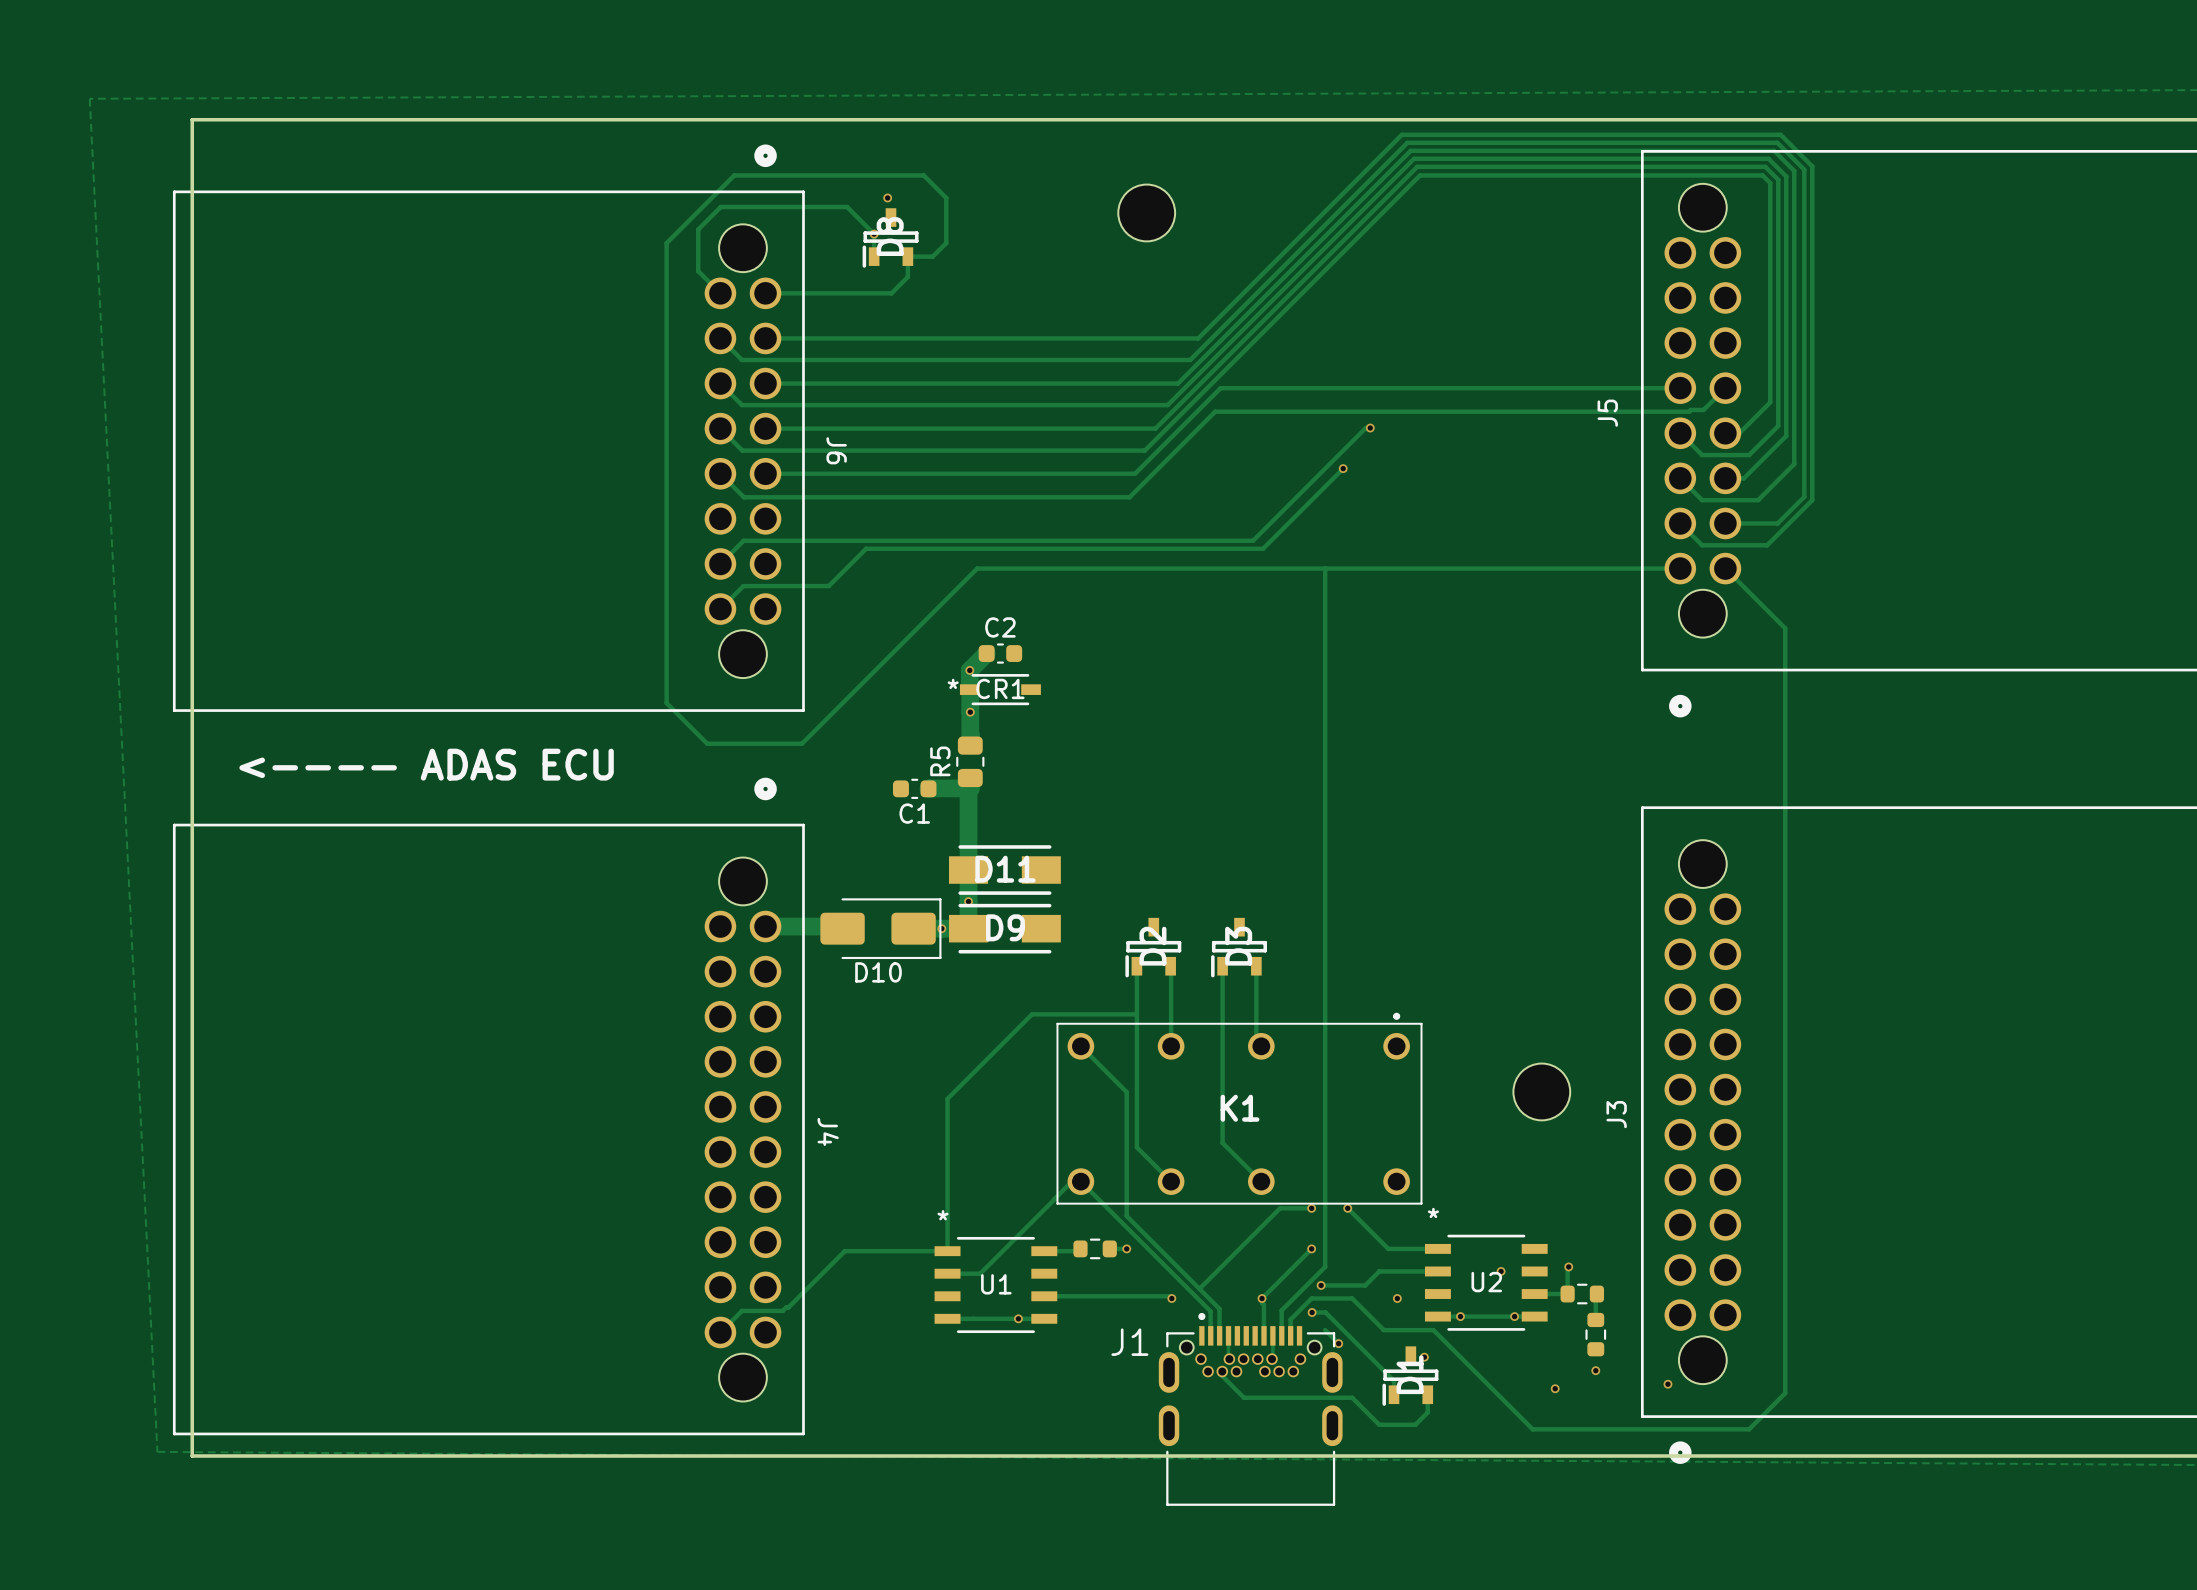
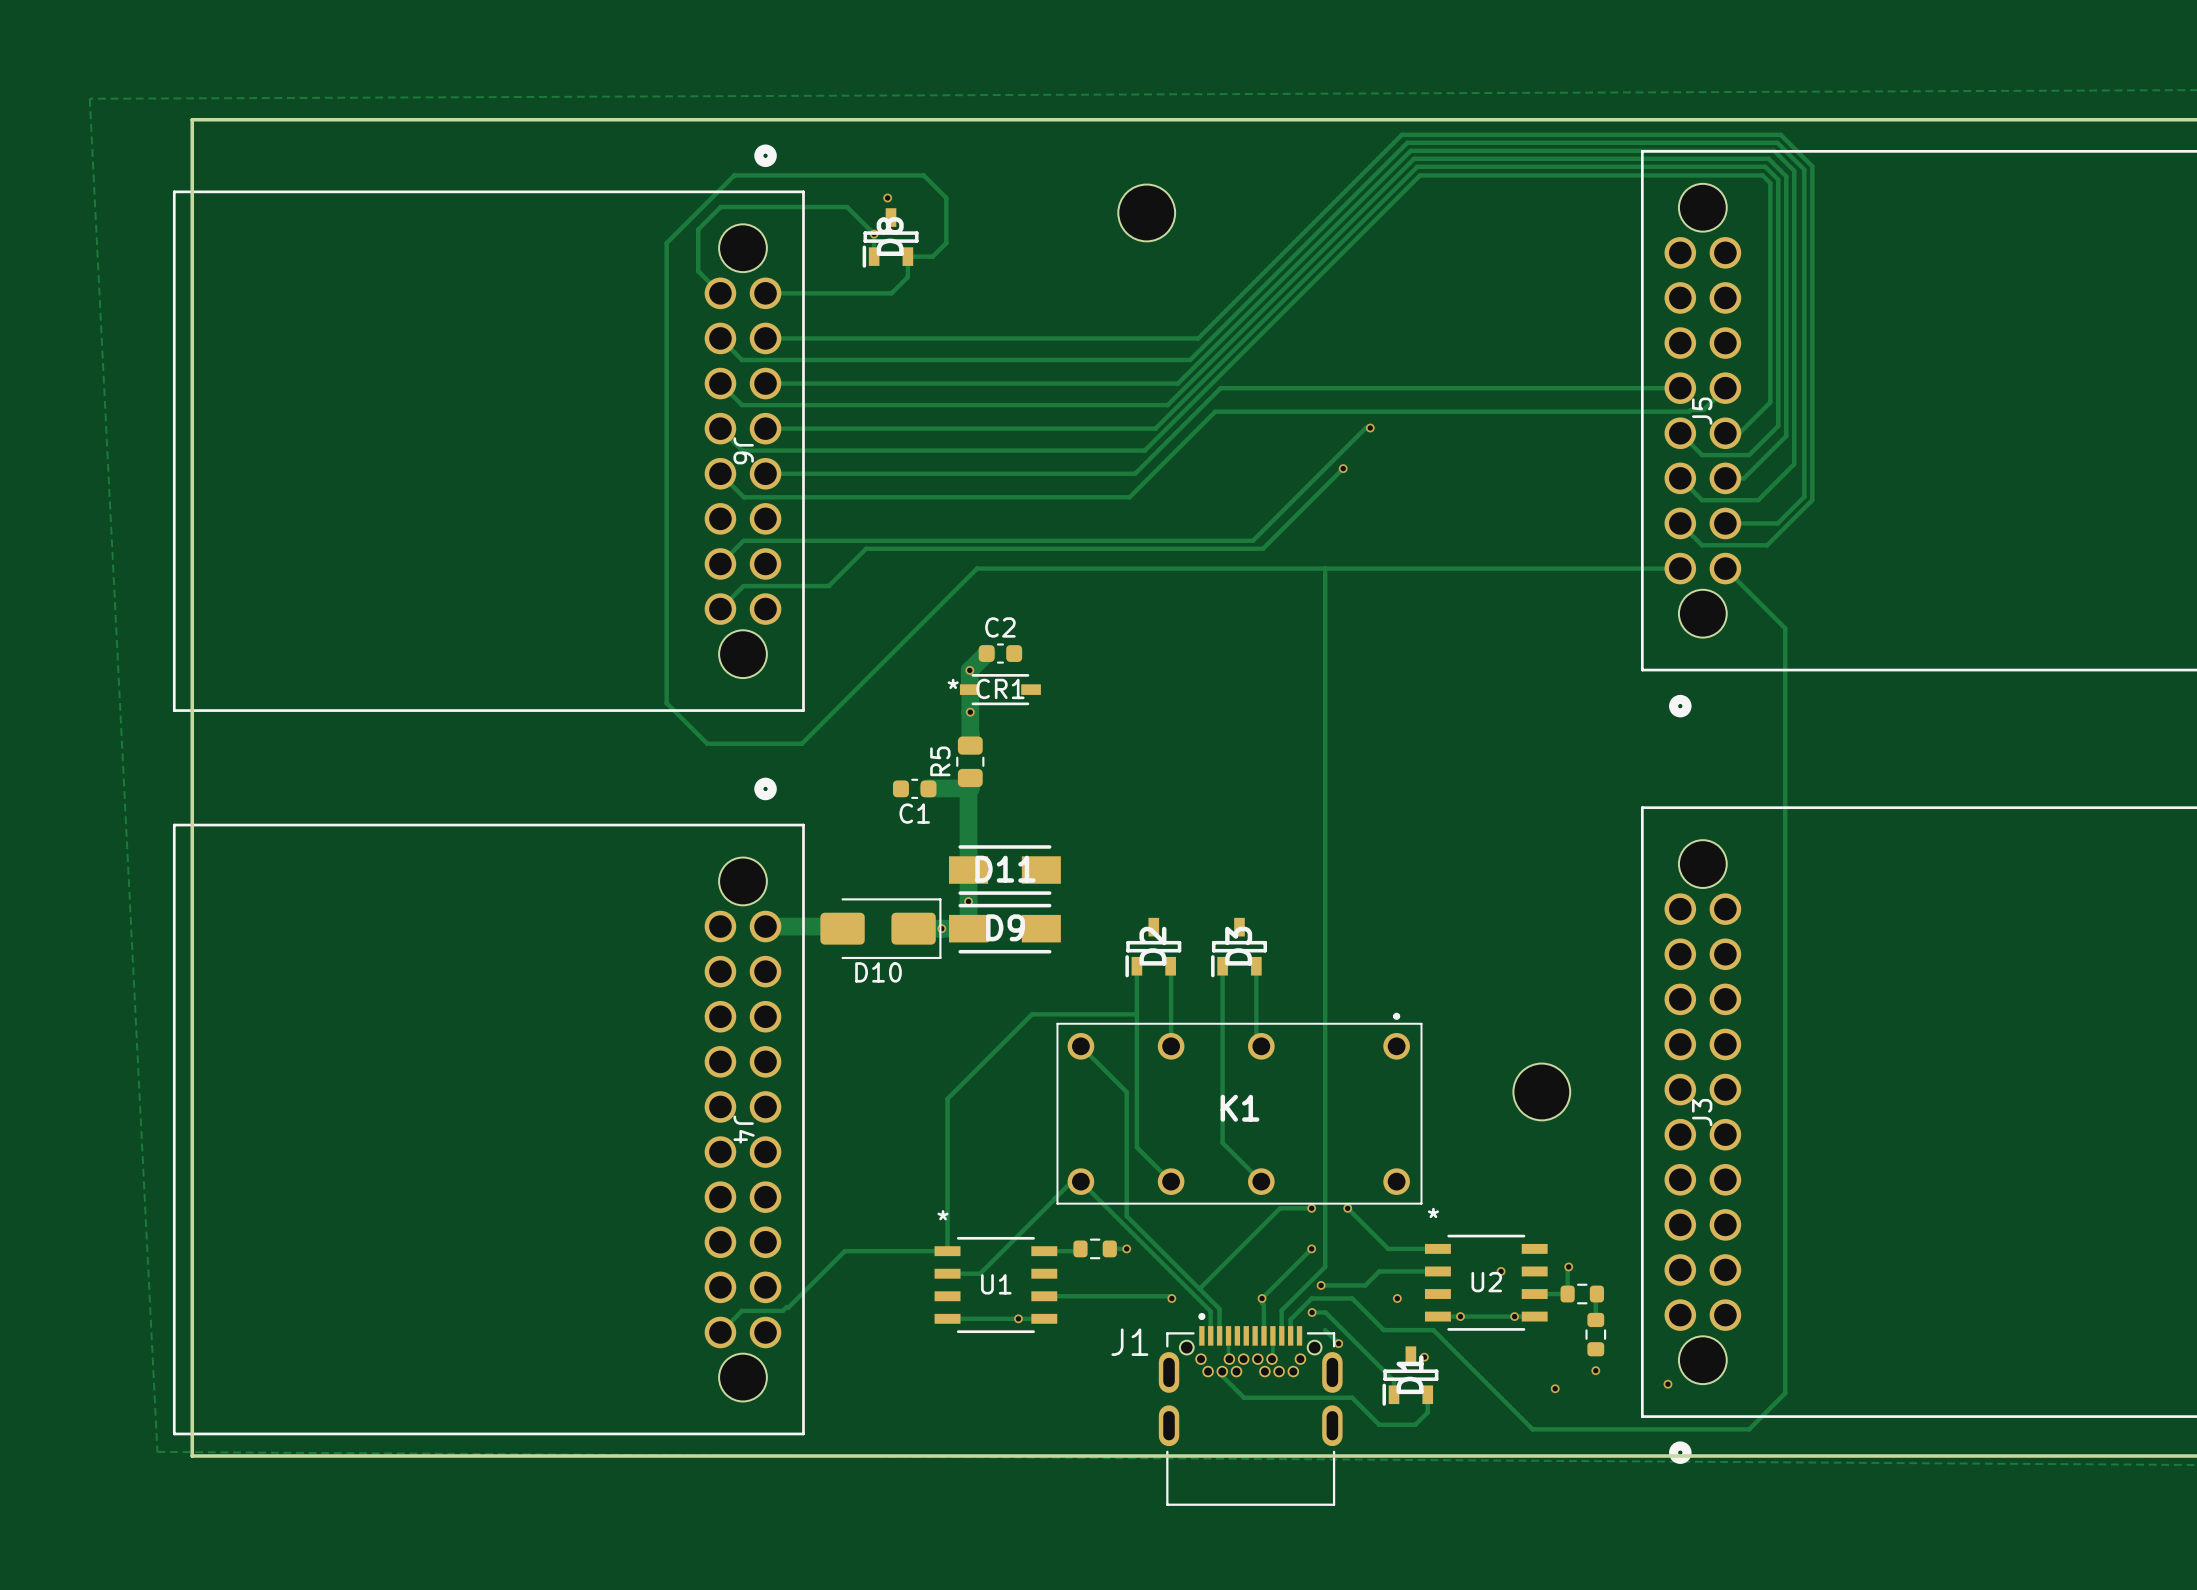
J5 name position: J5 (1607, 413) -> J5 (1702, 411)
J6 name position: J6 (836, 450) -> J6 (743, 450)
text: <---- ADAS ECU (426, 764) -> none
J3 name position: J3 (1616, 1114) -> J3 (1702, 1112)
J4 name position: J4 (828, 1131) -> J4 (744, 1129)

